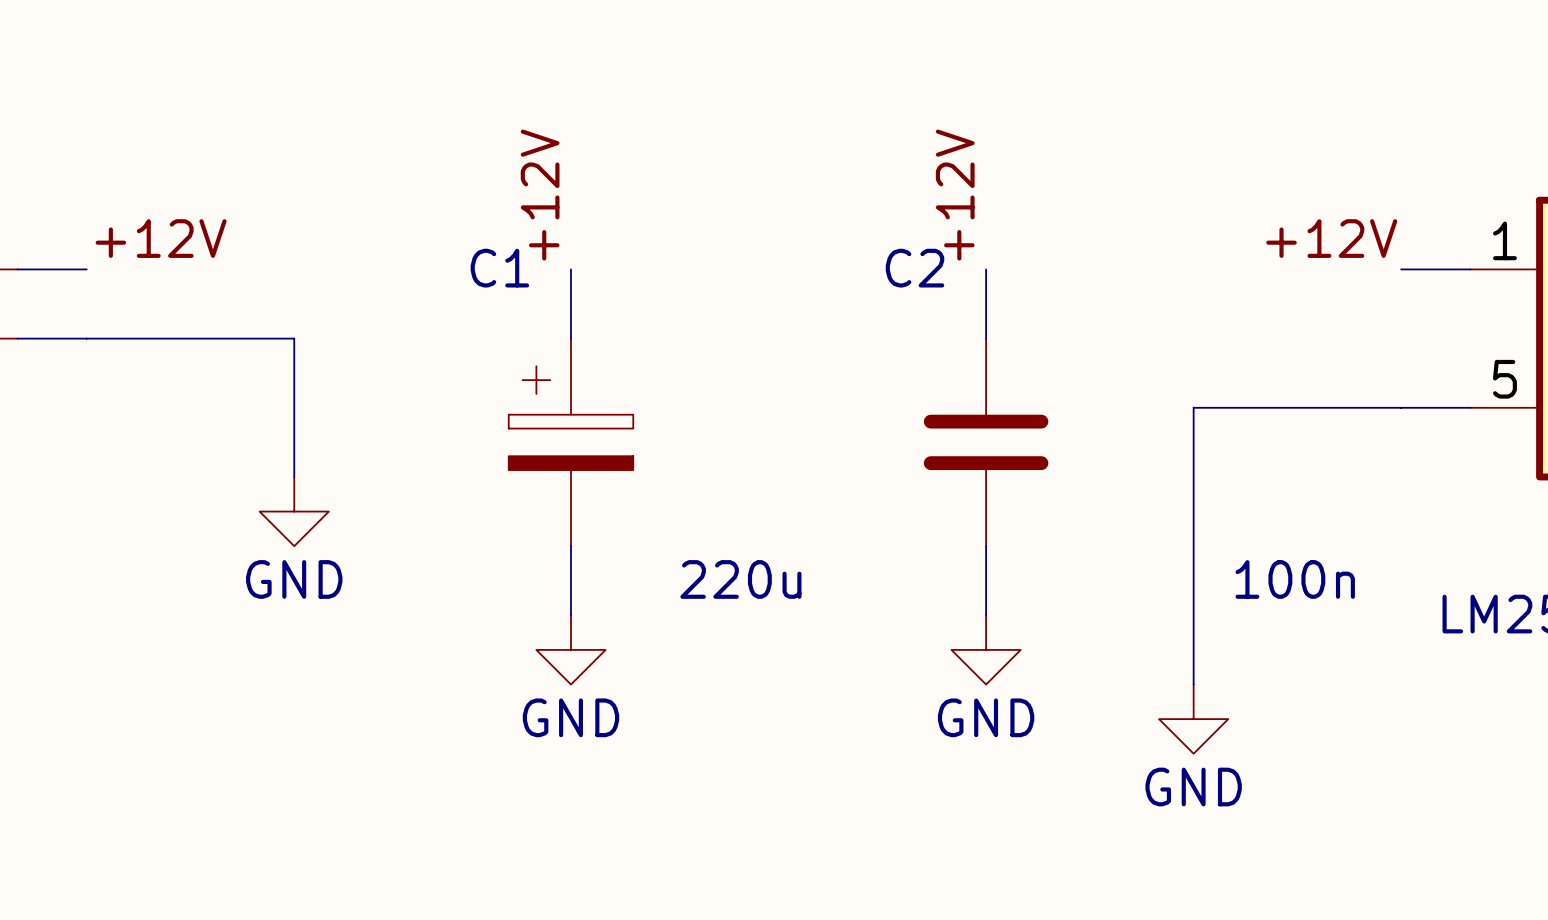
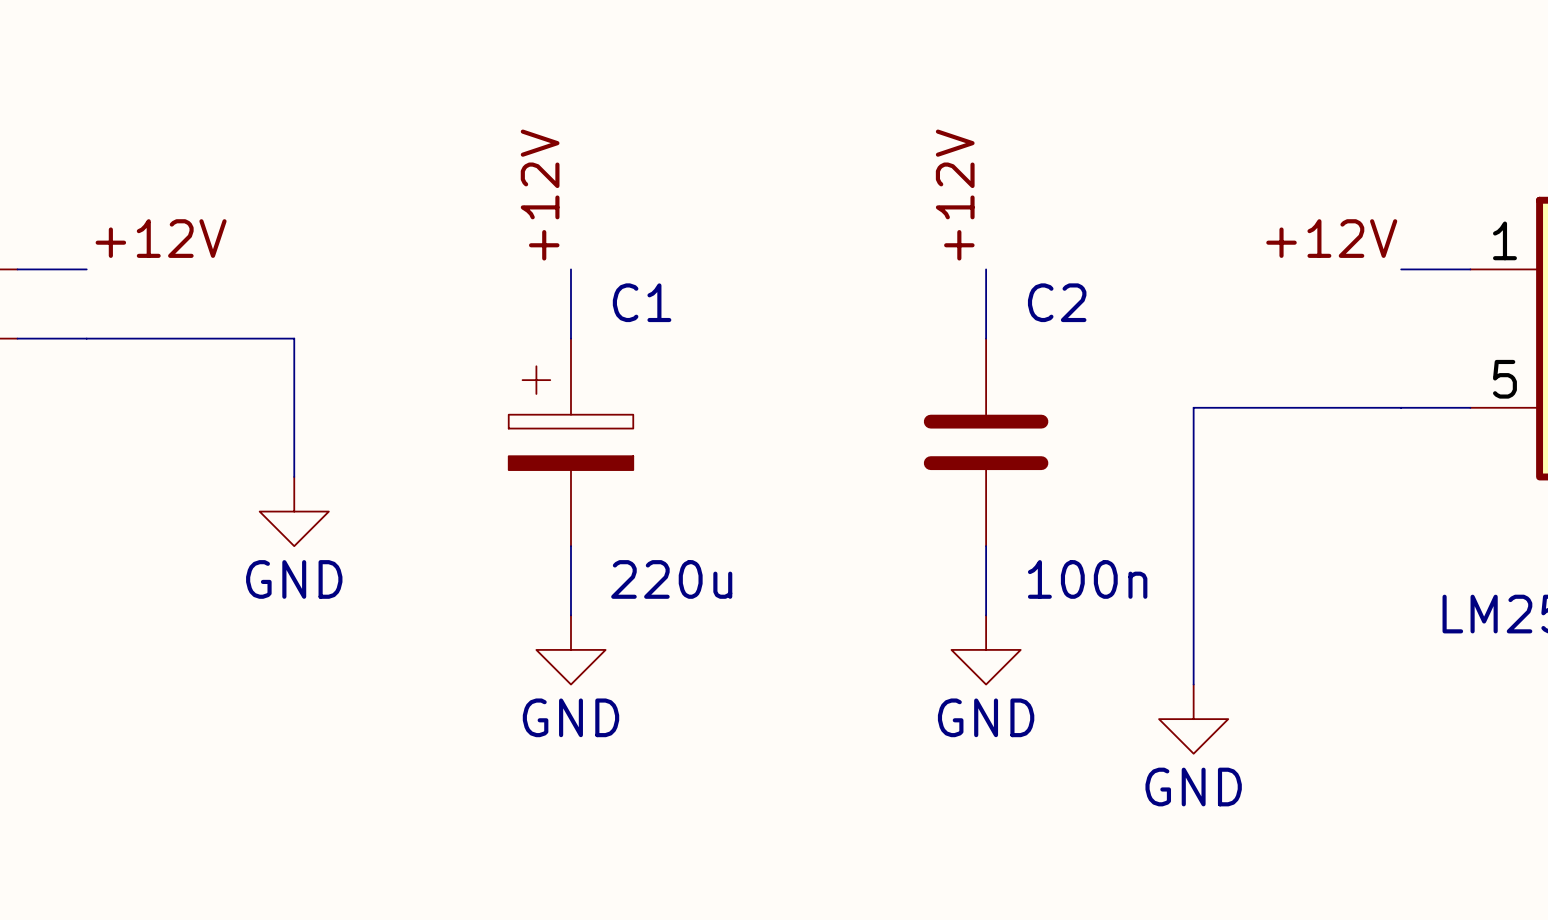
C1 name position: C1 (499, 268) -> C1 (642, 302)
C2 name position: C2 (915, 268) -> C2 (1057, 302)
C1 value position: 220u (740, 579) -> 220u (671, 579)
C2 value position: 100n (1295, 579) -> 100n (1087, 579)

